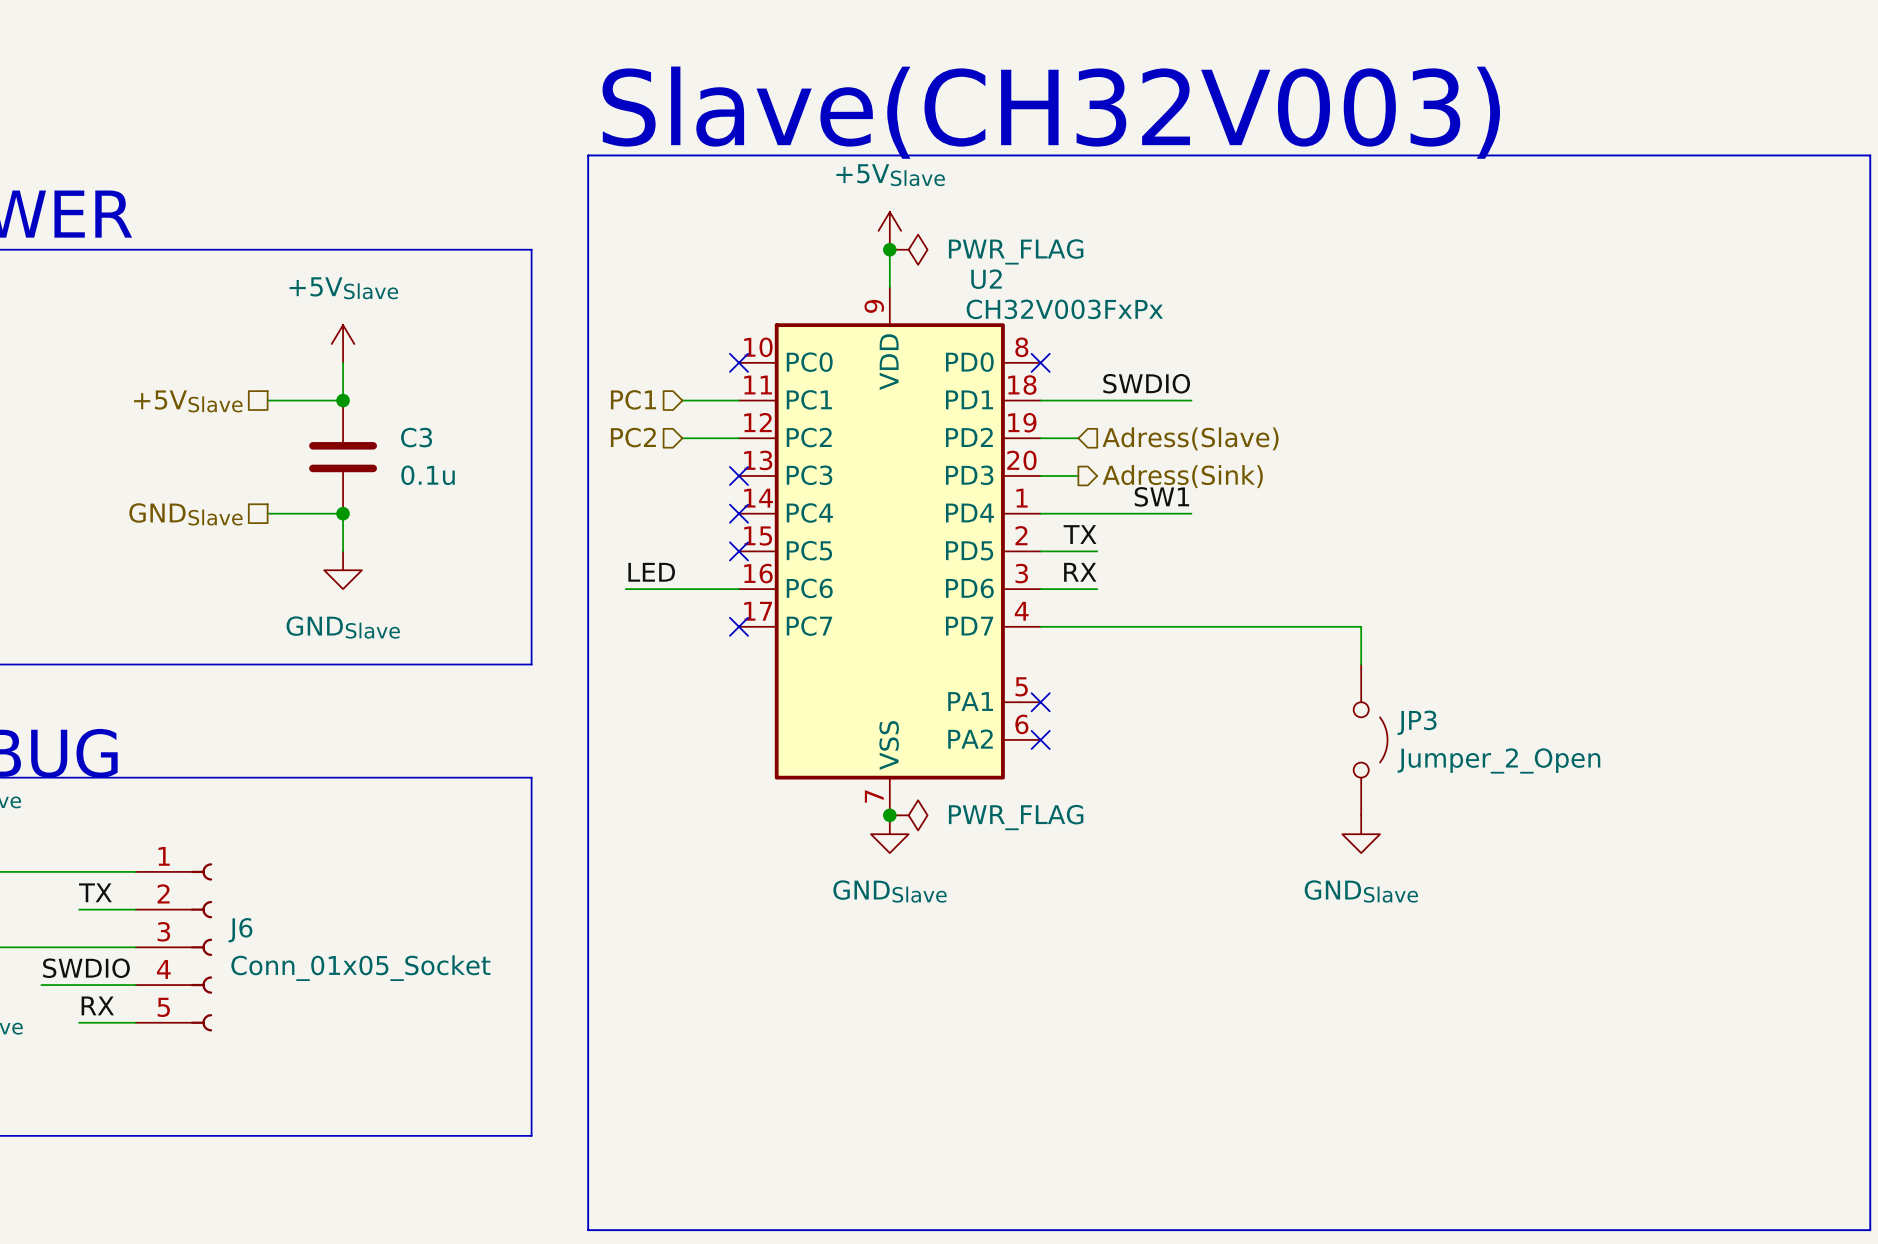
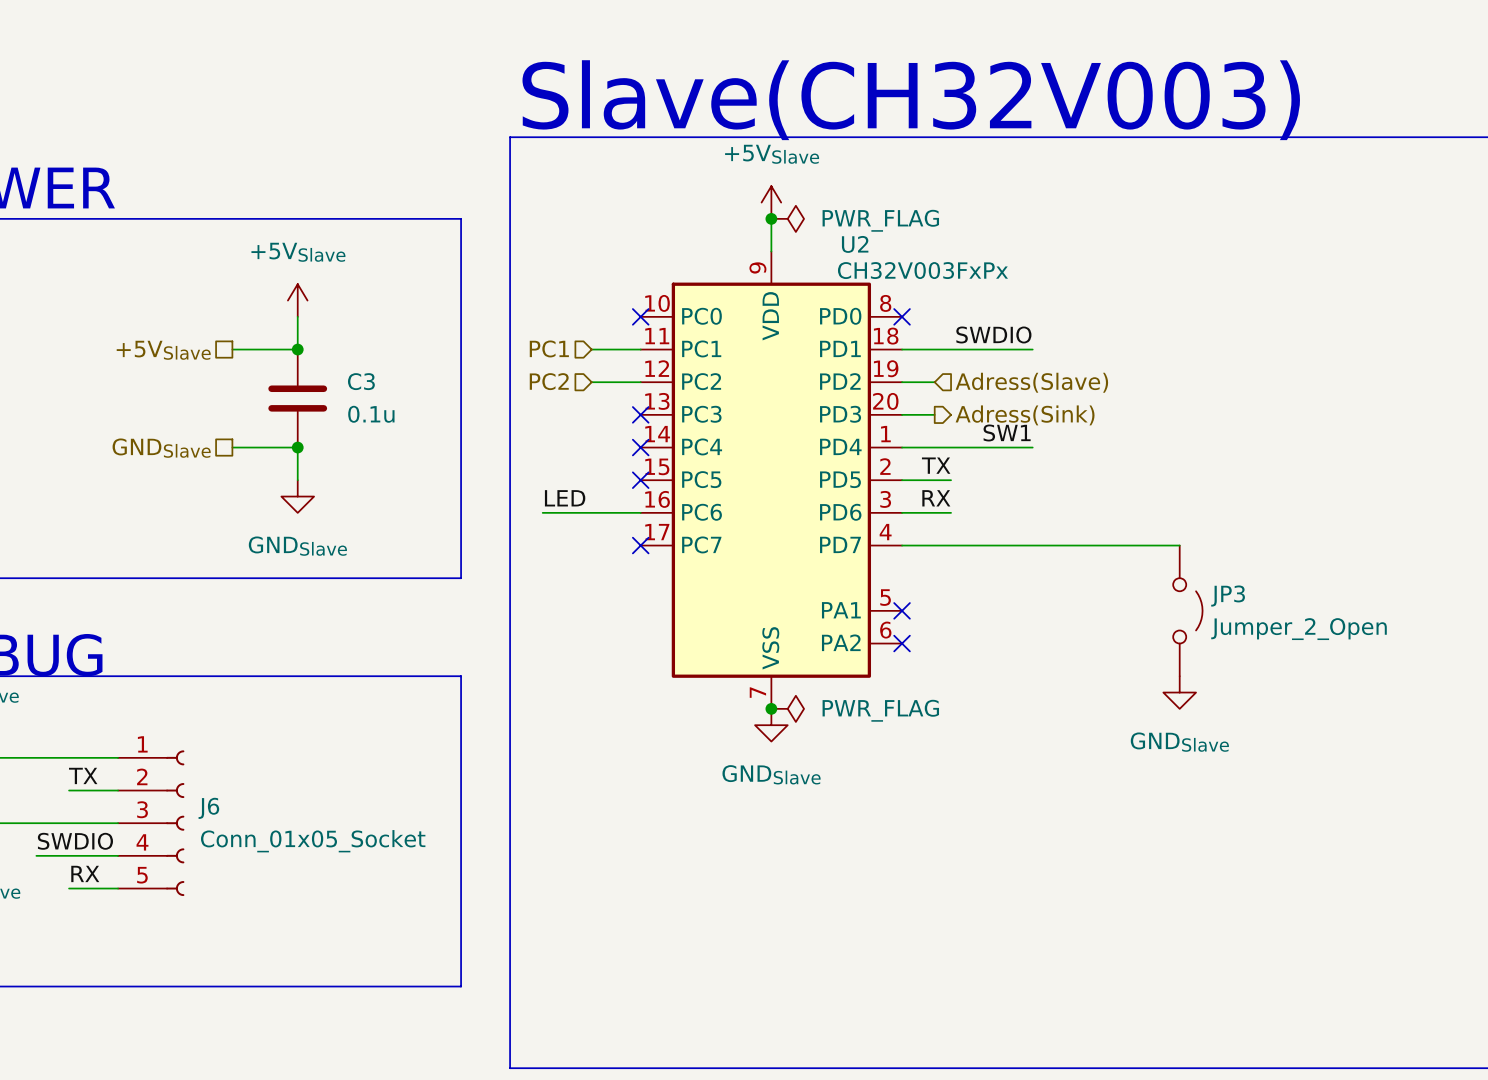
JP3 position: (1370, 739) -> (1187, 610)
power symbol position: GNDSlave (1361, 834) -> GNDSlave (1179, 692)

